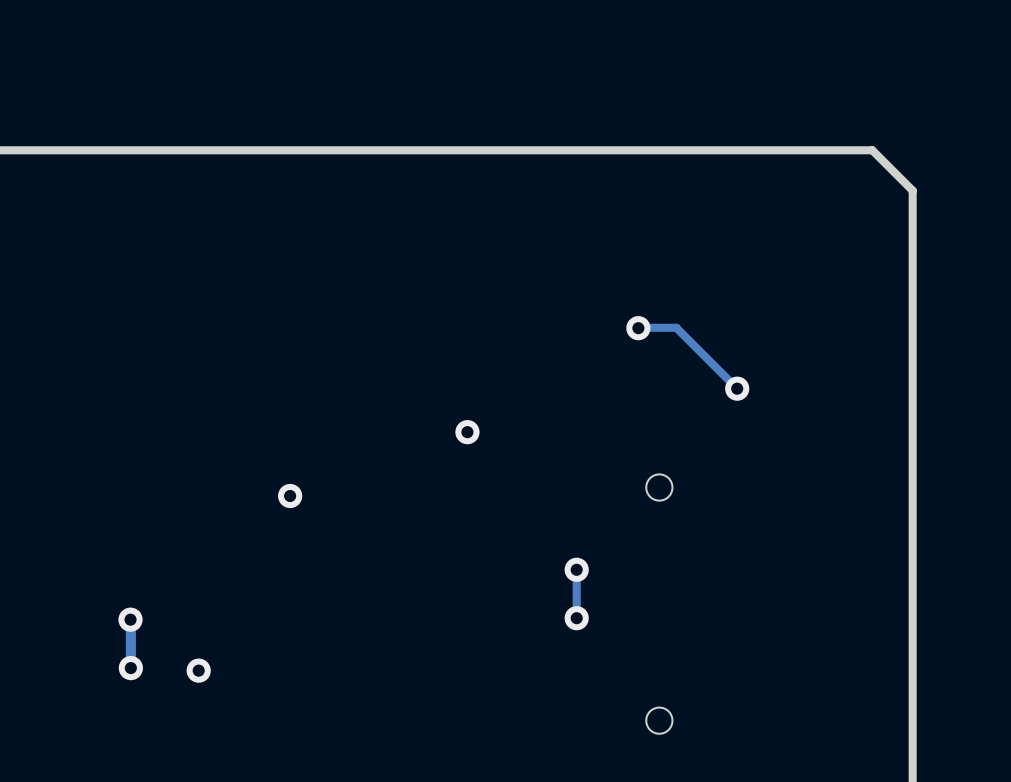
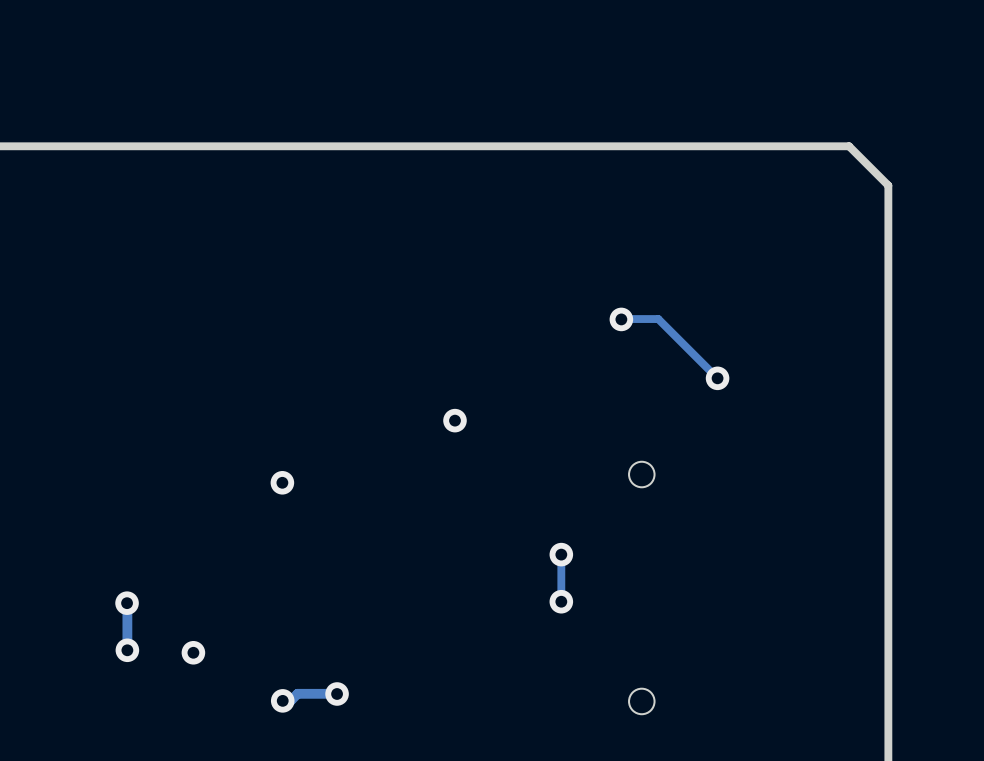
track: none -> (336, 693) (297, 693) (290, 700) (282, 700)
via: none -> (337, 693)
via: none -> (282, 700)

